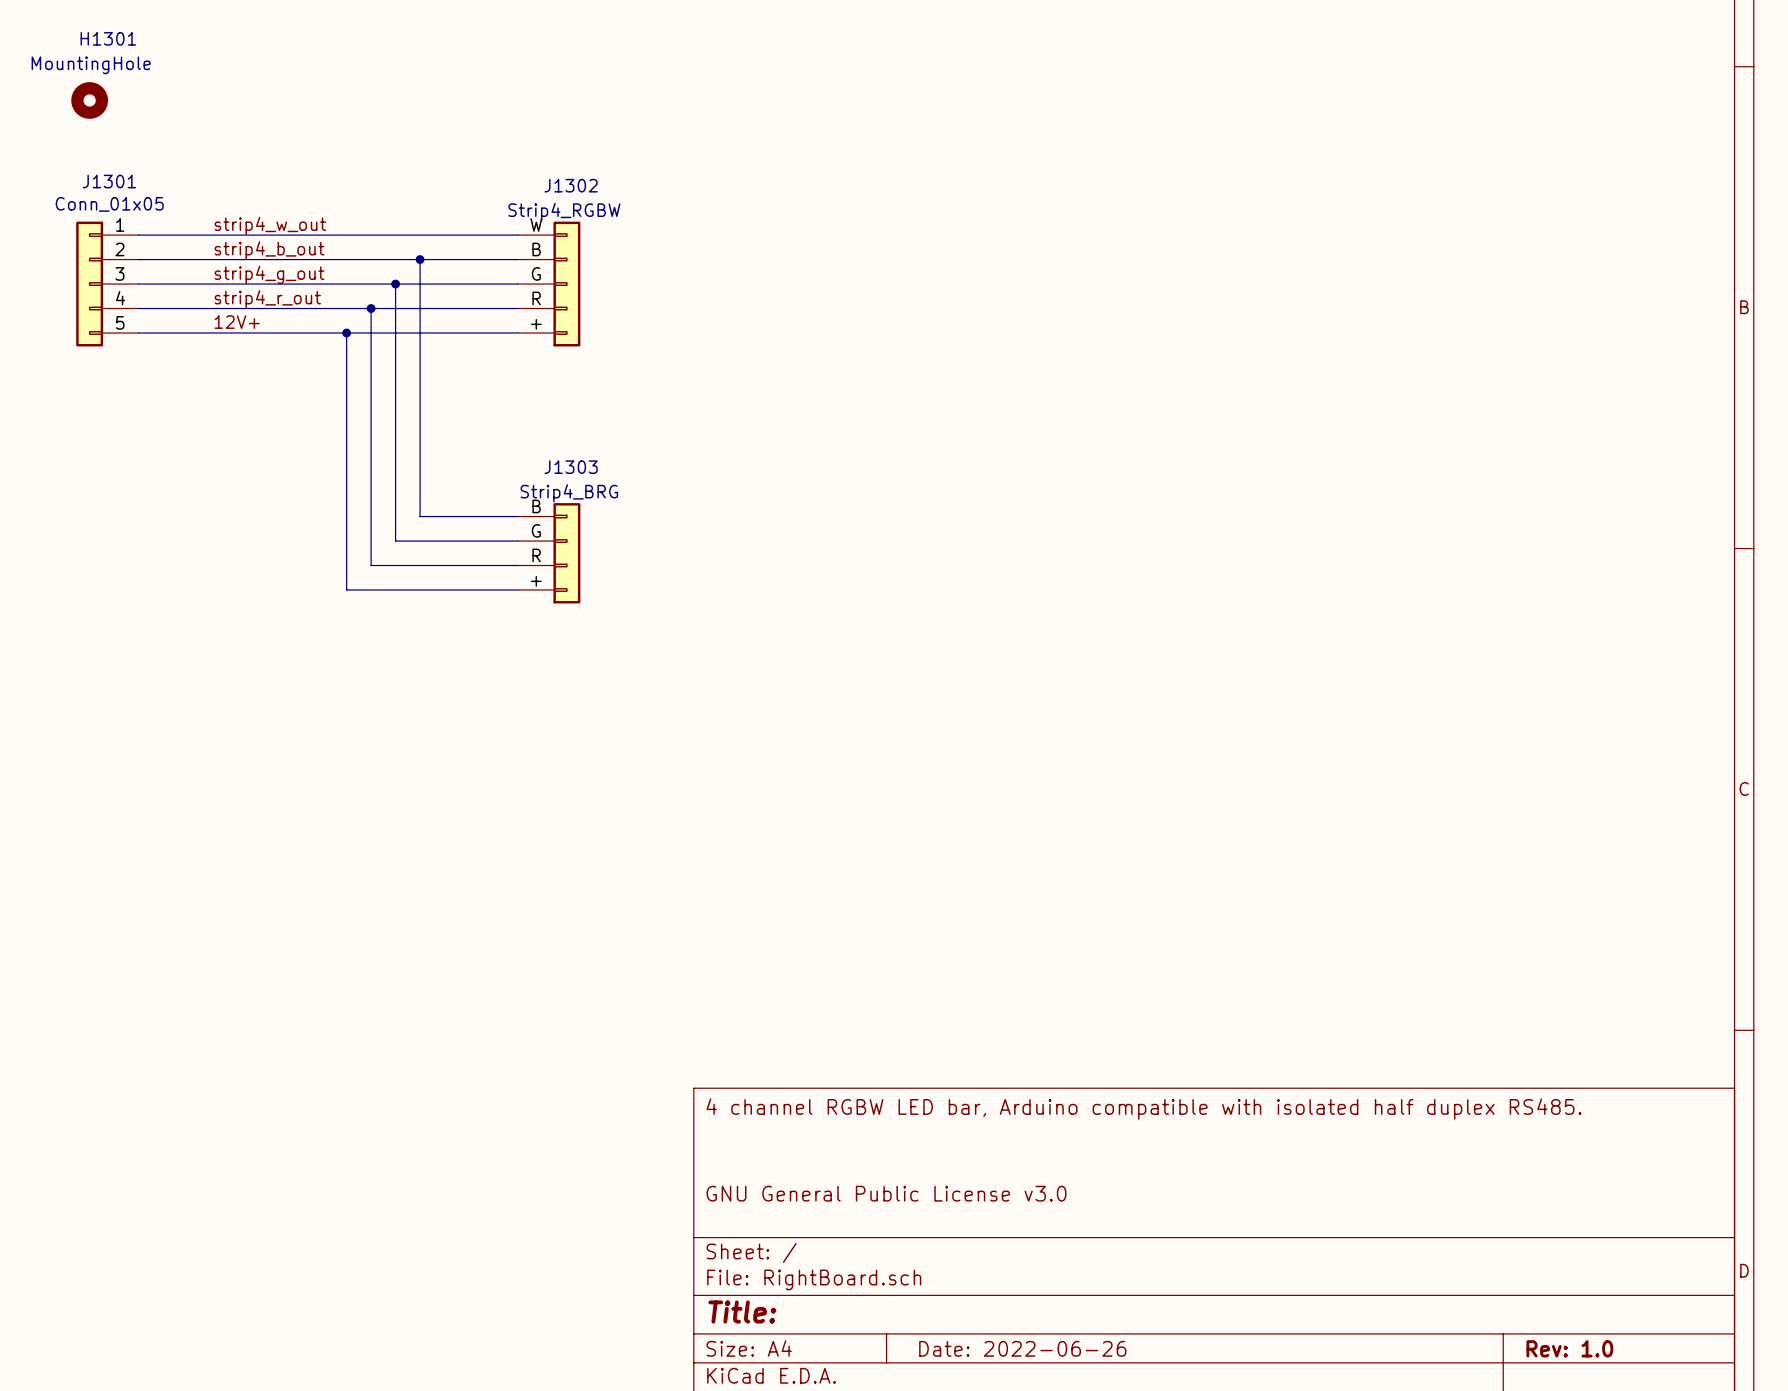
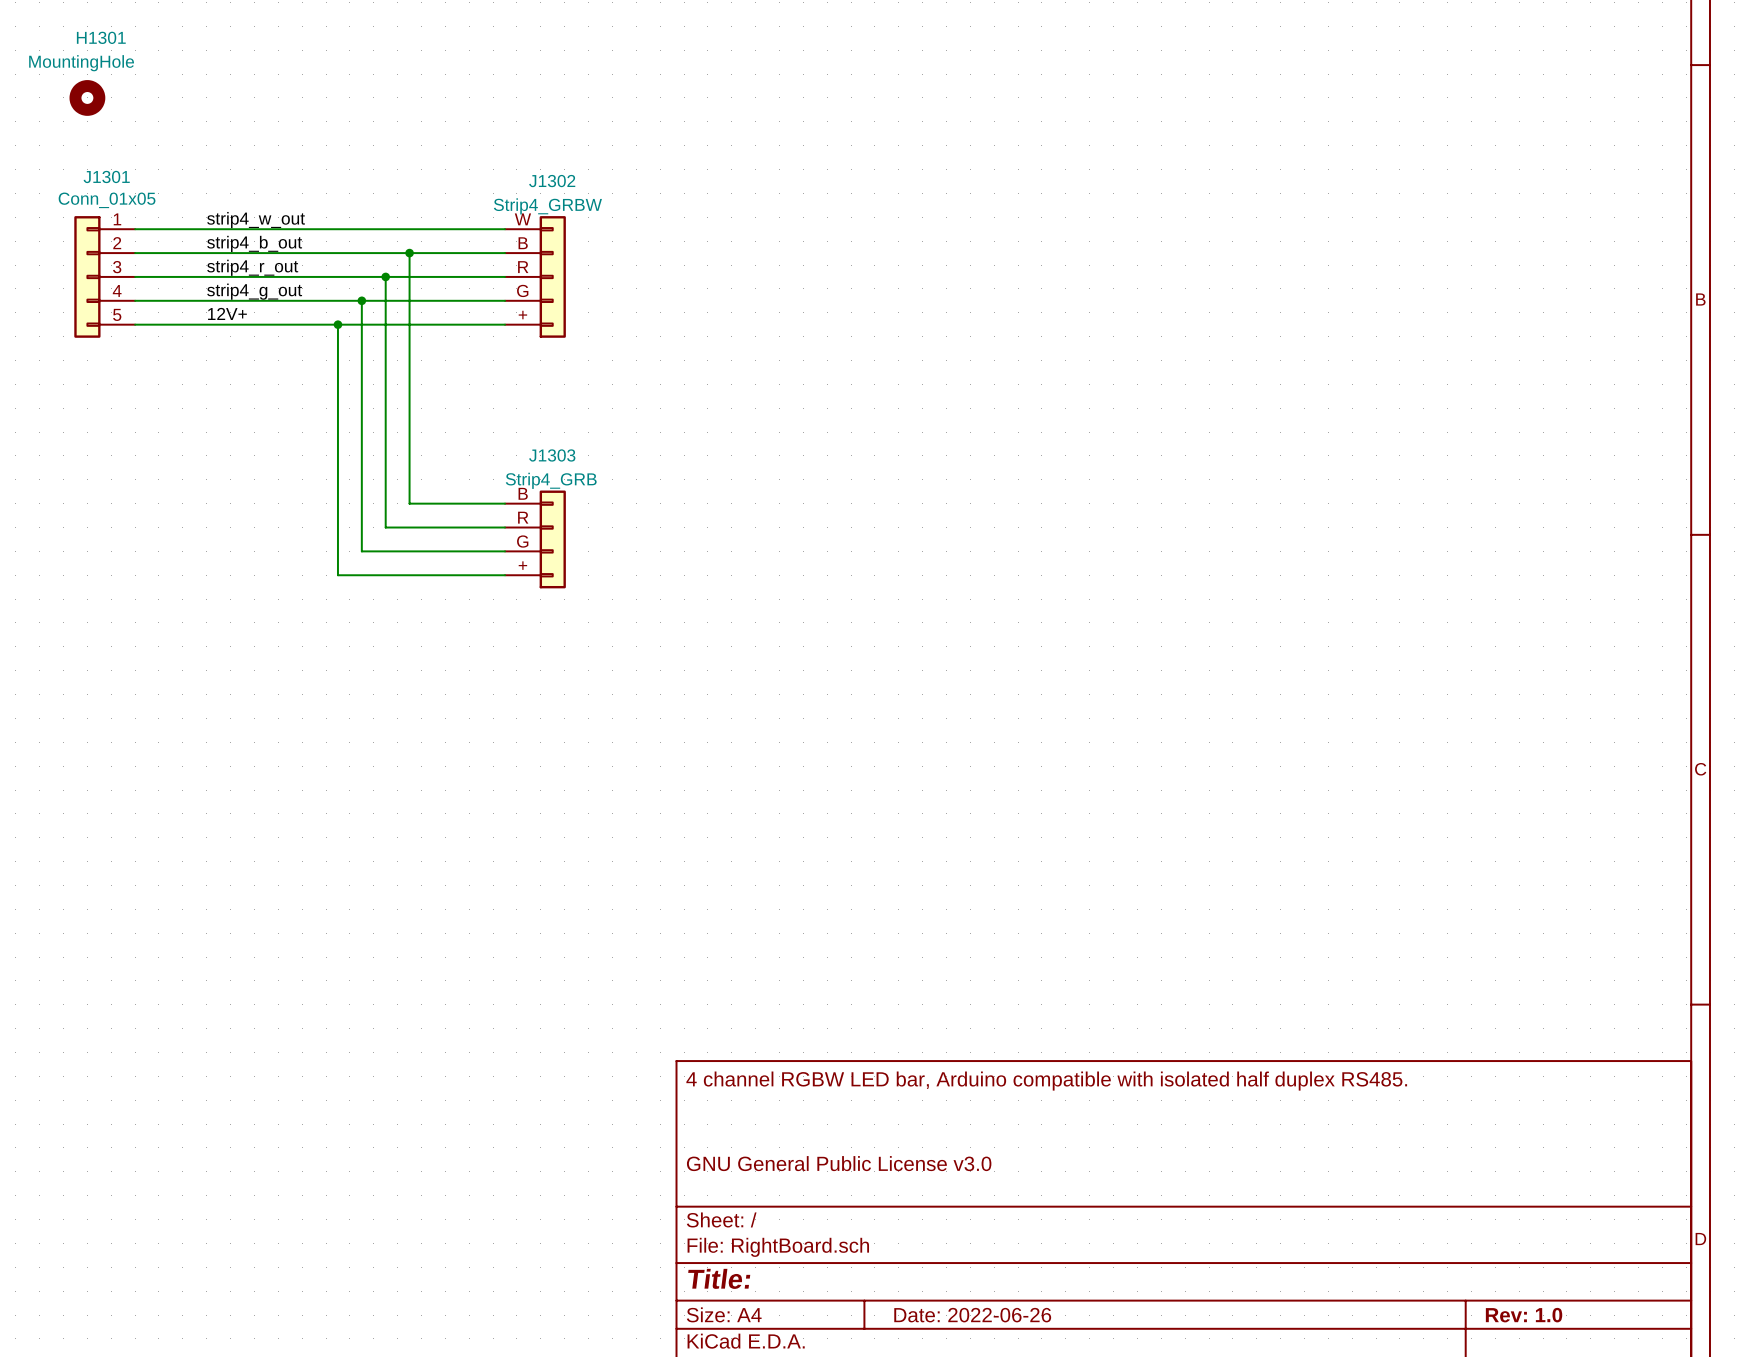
J1302 value: Strip4_RGBW (564, 211) -> Strip4_GRBW (547, 206)
J1302 pin number: G (536, 273) -> R (523, 267)
label: strip4_g_out (269, 274) -> strip4_r_out (252, 267)
J1302 pin number: R (536, 298) -> G (522, 290)
label: strip4_r_out (267, 299) -> strip4_g_out (254, 291)
J1303 value: Strip4_BRG (569, 493) -> Strip4_GRB (551, 480)
J1303 pin number: G (536, 530) -> R (523, 517)
J1303 pin number: R (536, 555) -> G (522, 541)

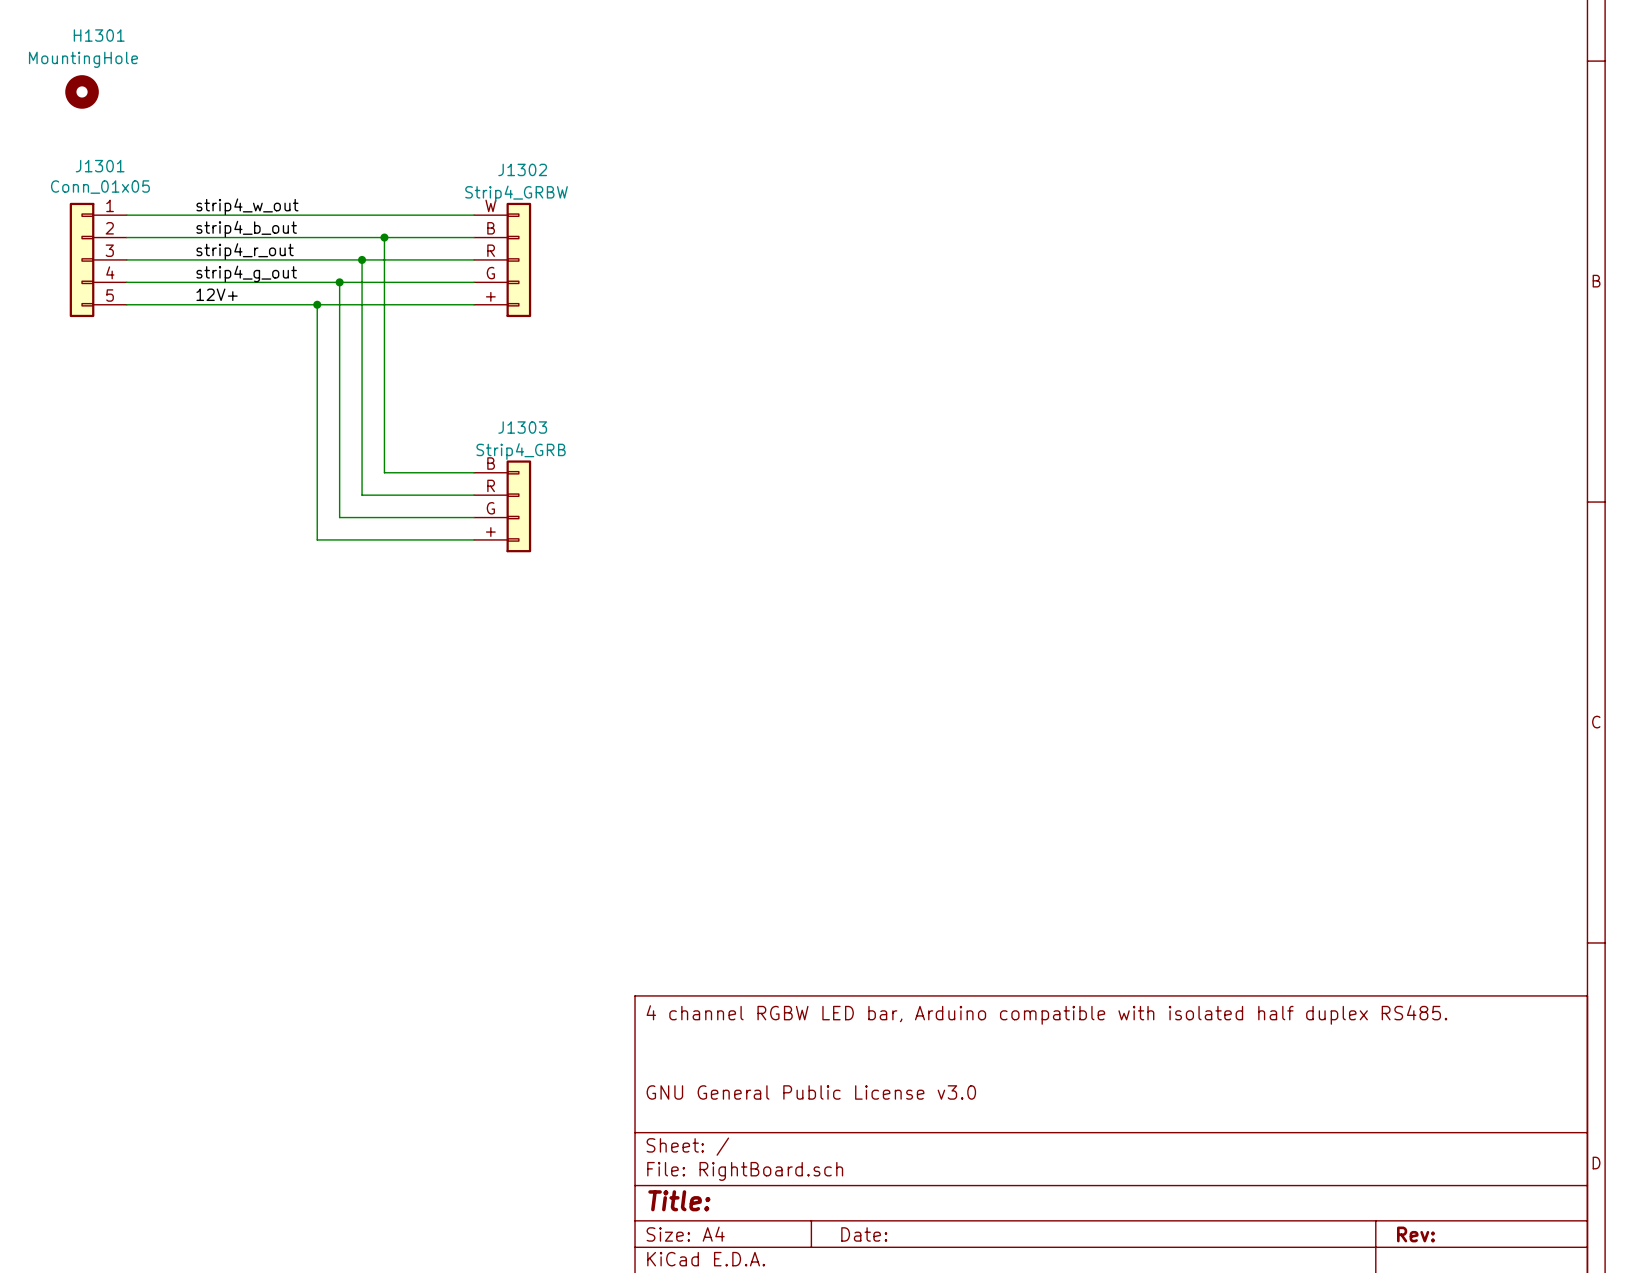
title block: Date: 2022-06-26 (972, 1315) -> Date: (864, 1234)
title block: Rev: 1.0 (1524, 1315) -> Rev: (1415, 1234)

